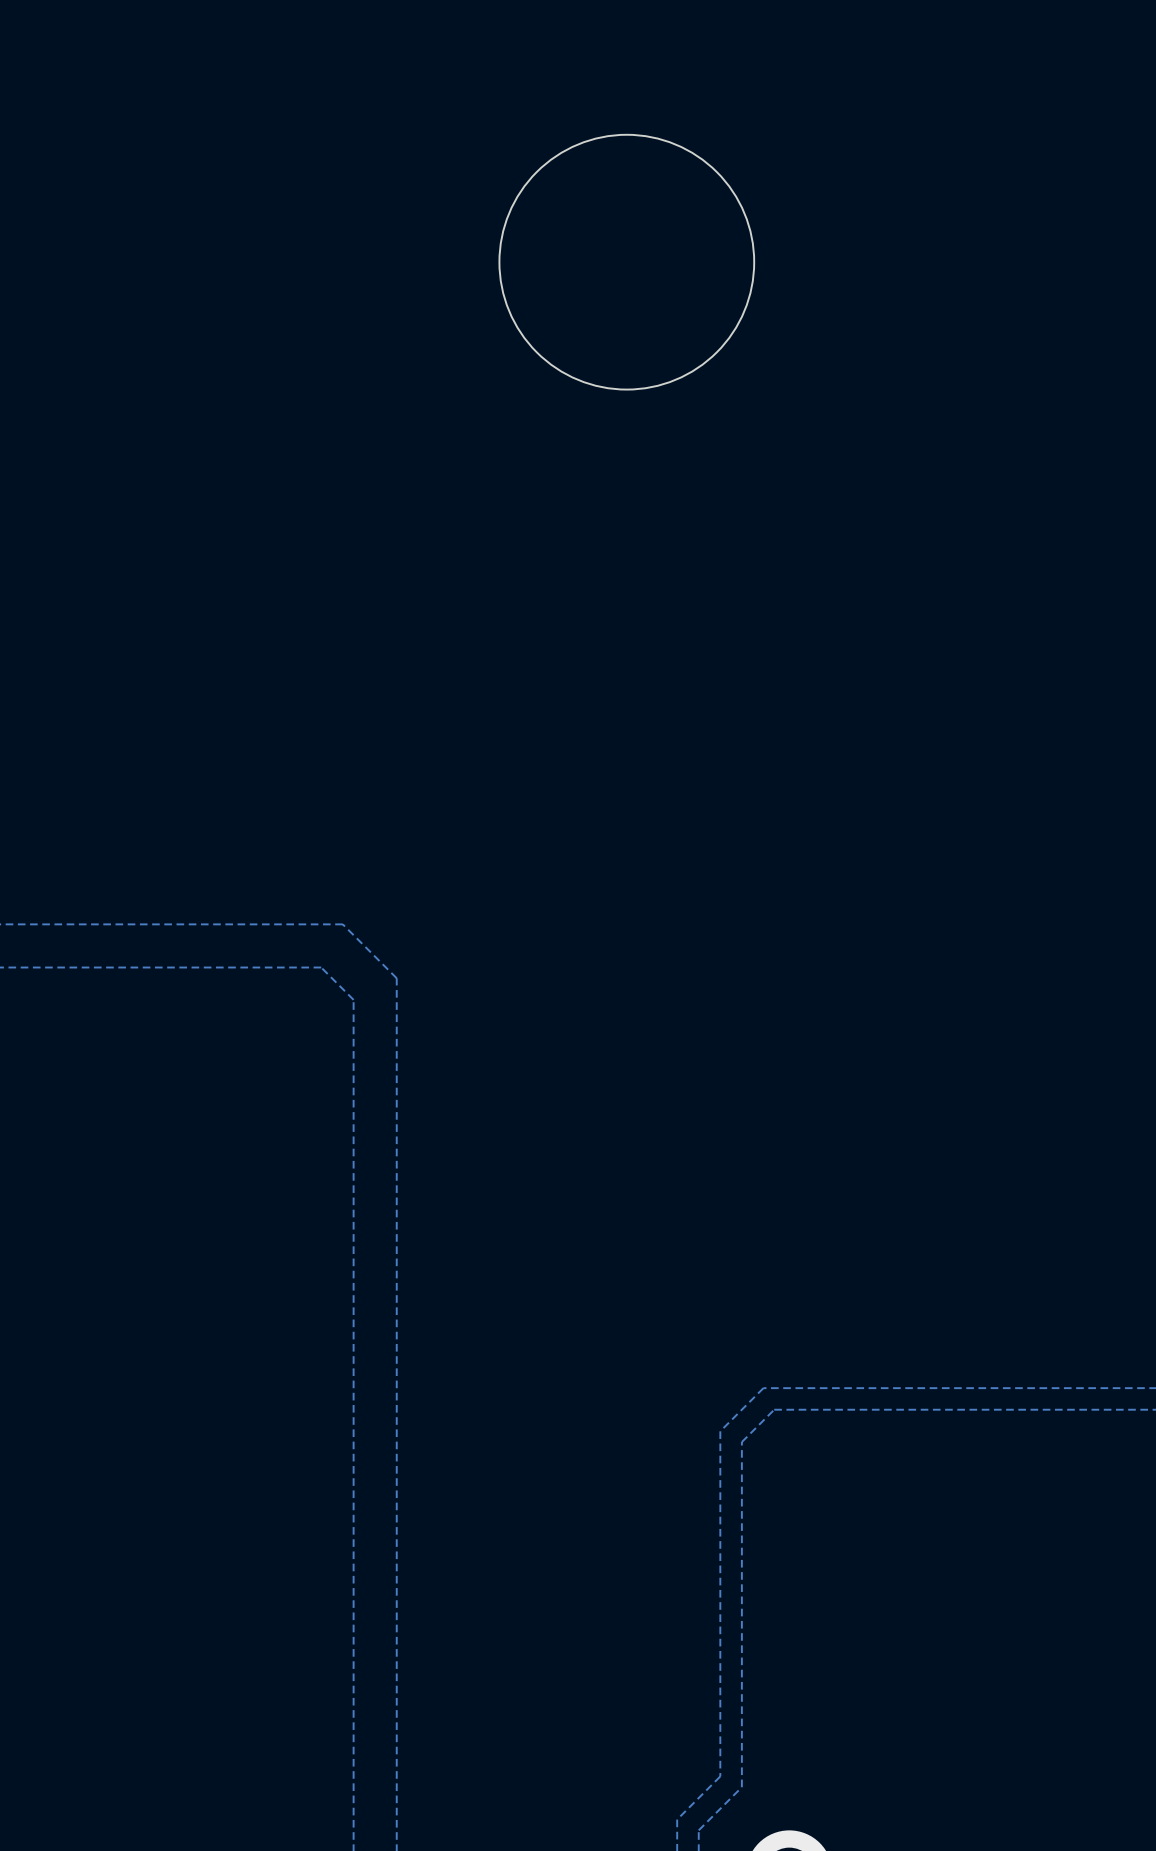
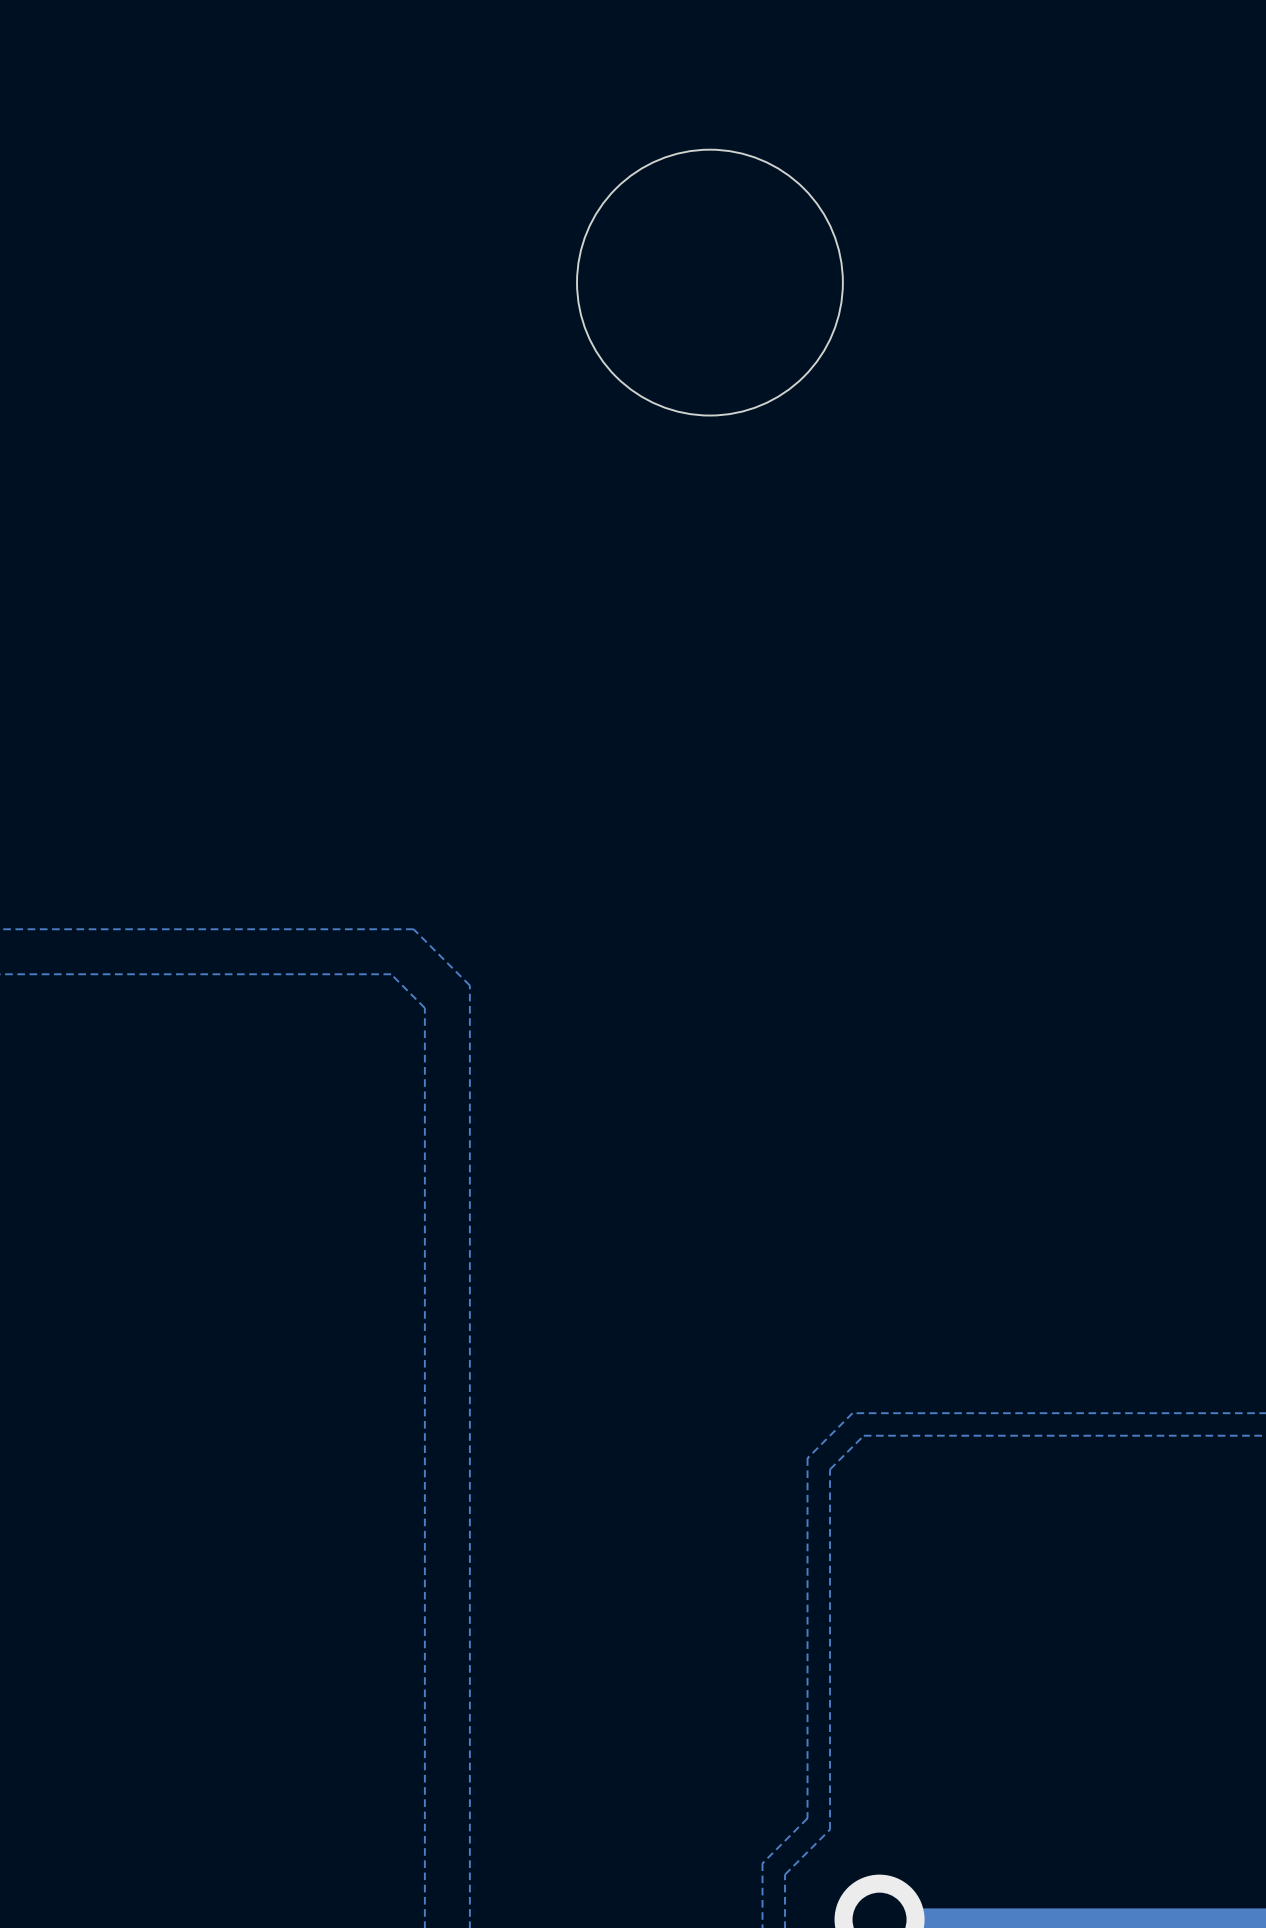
round board edge position: (626, 262) -> (709, 282)

